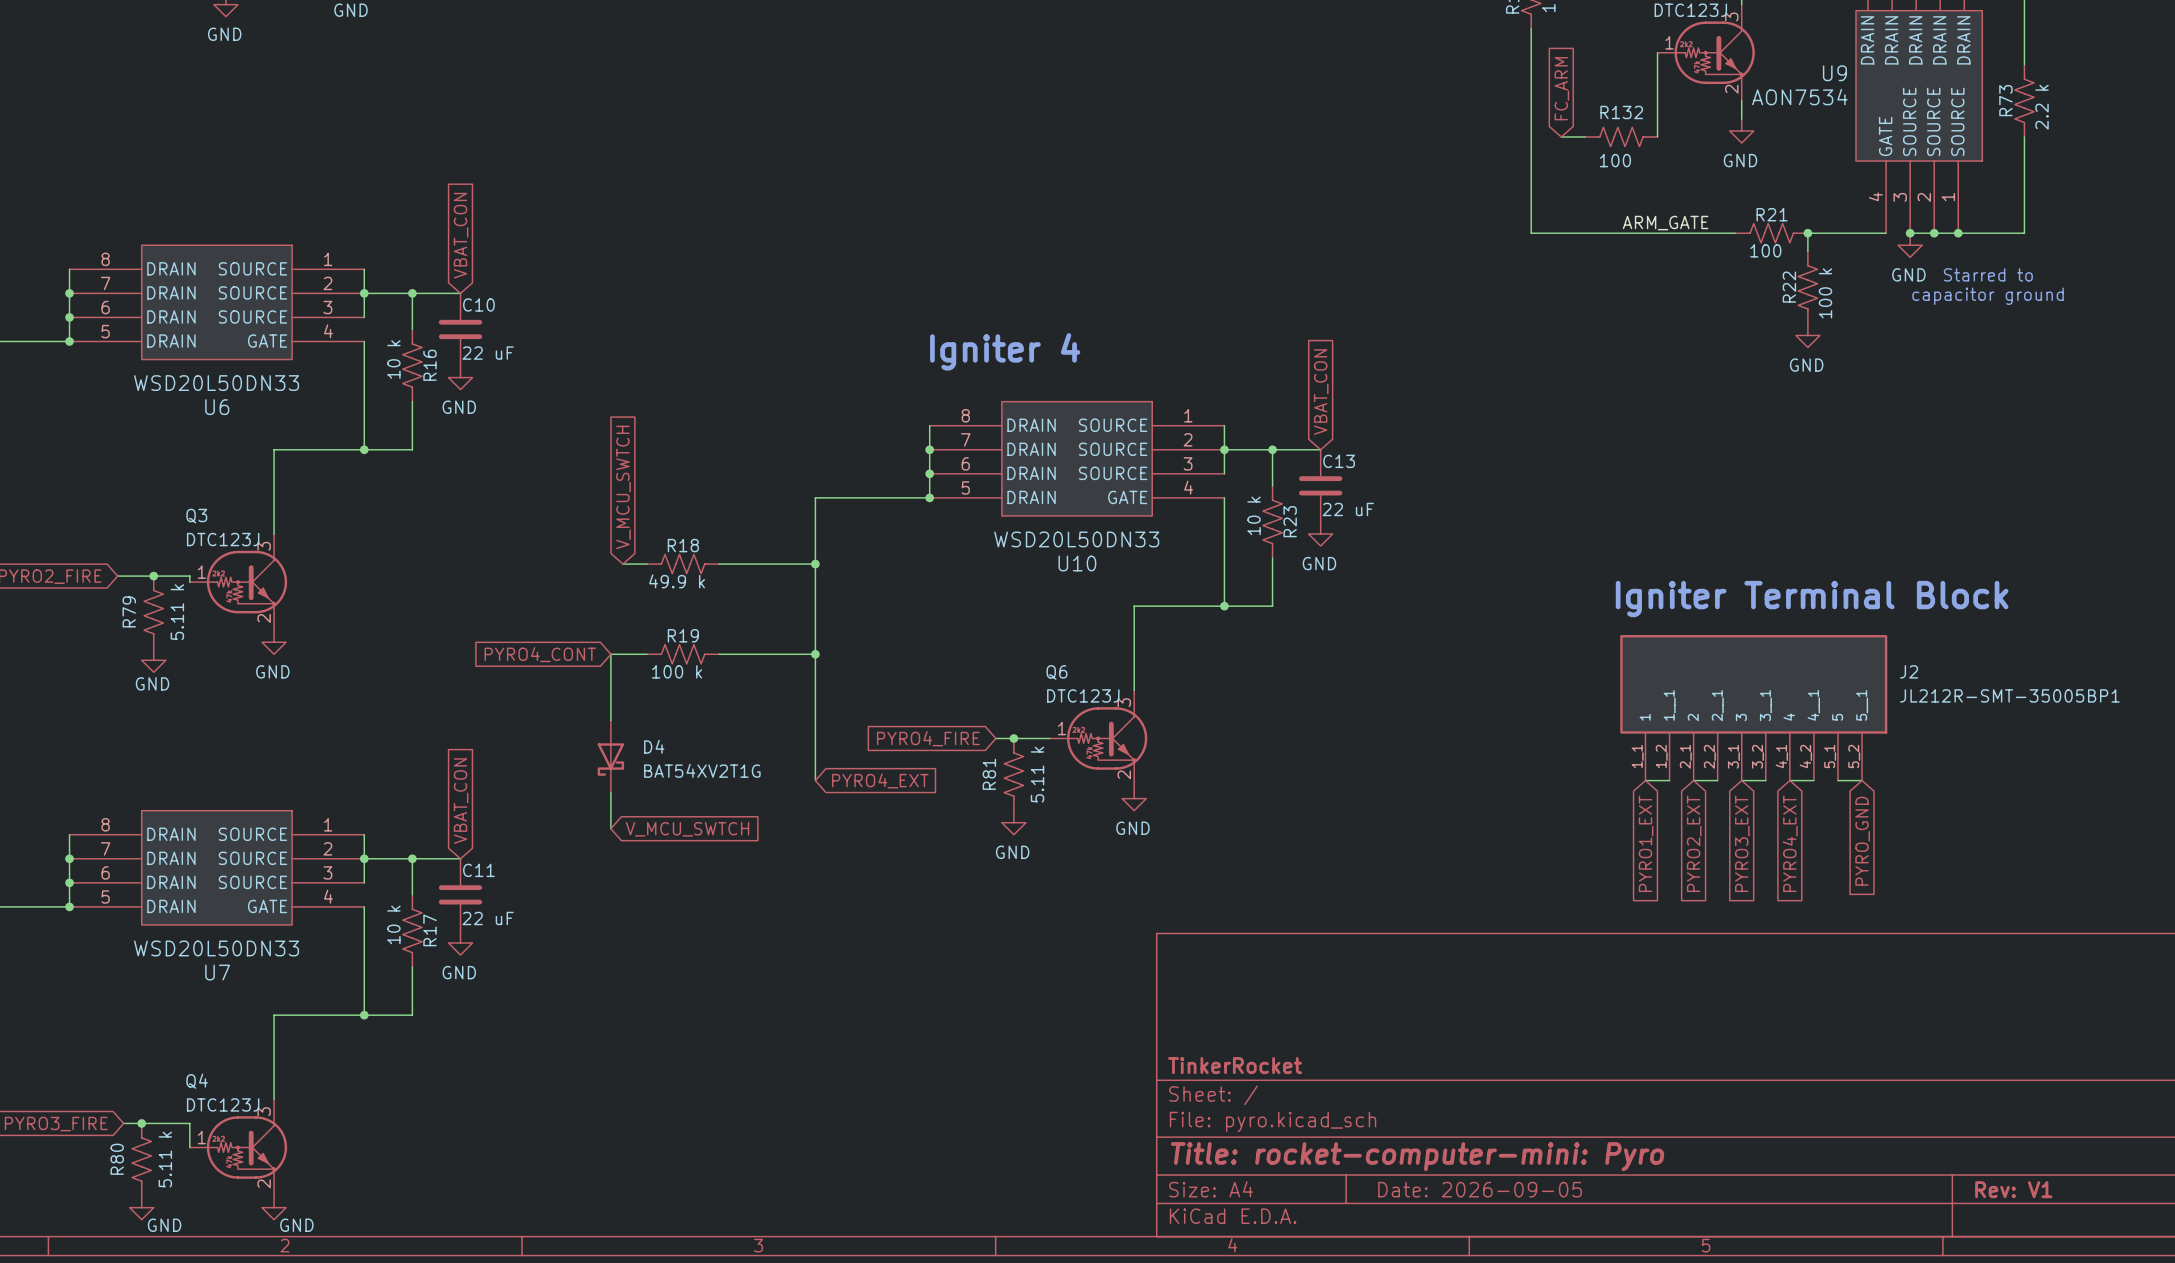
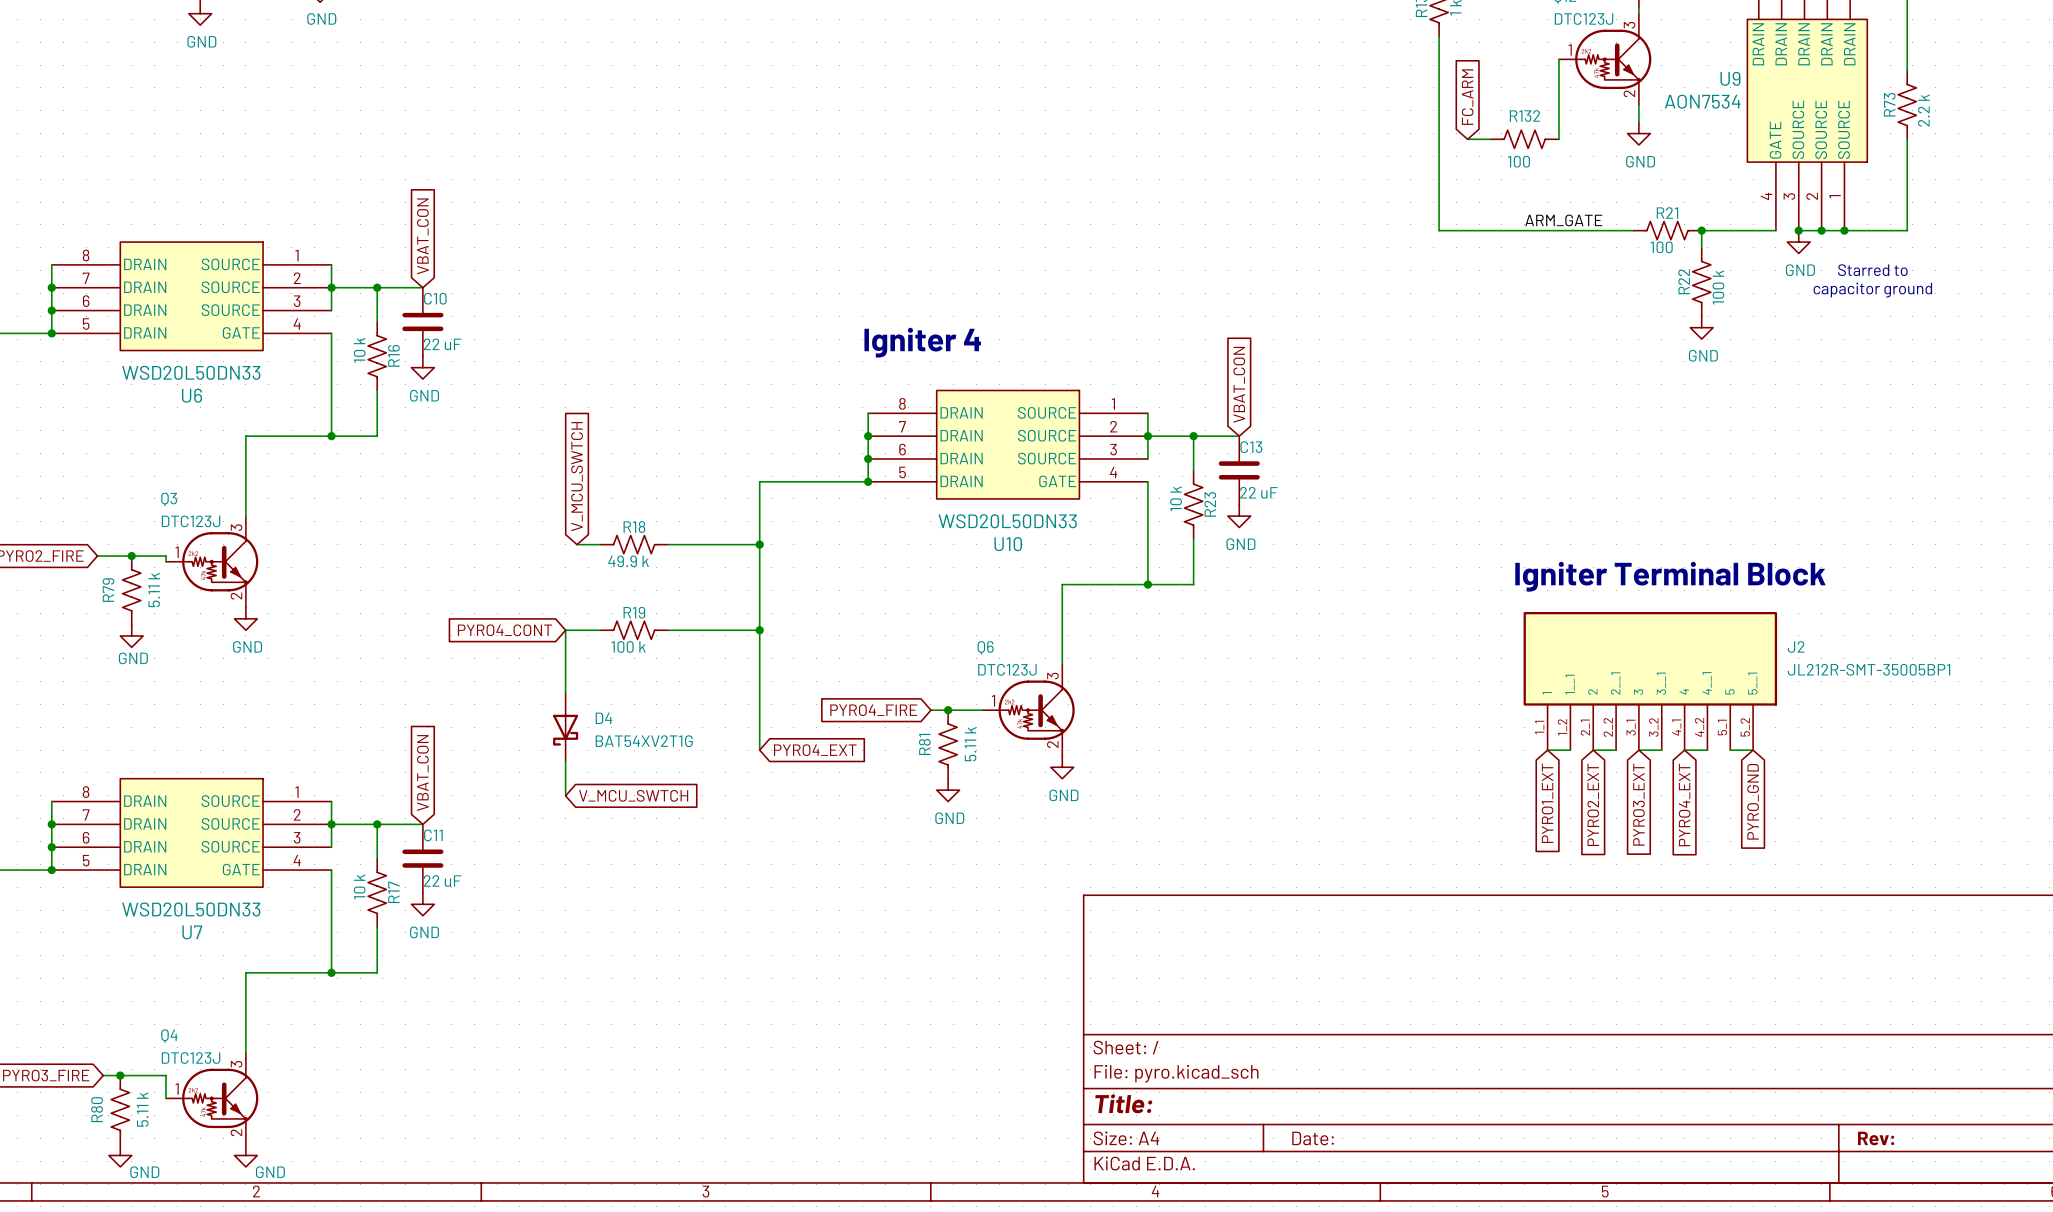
title block: TinkerRocket (1235, 1065) -> none
title block: Title: rocket-computer-mini: Pyro (1417, 1156) -> Title: (1123, 1103)
title block: Date: 2026-09-05 (1480, 1189) -> Date: (1313, 1138)
title block: Rev: V1 (2013, 1189) -> Rev: (1876, 1138)

